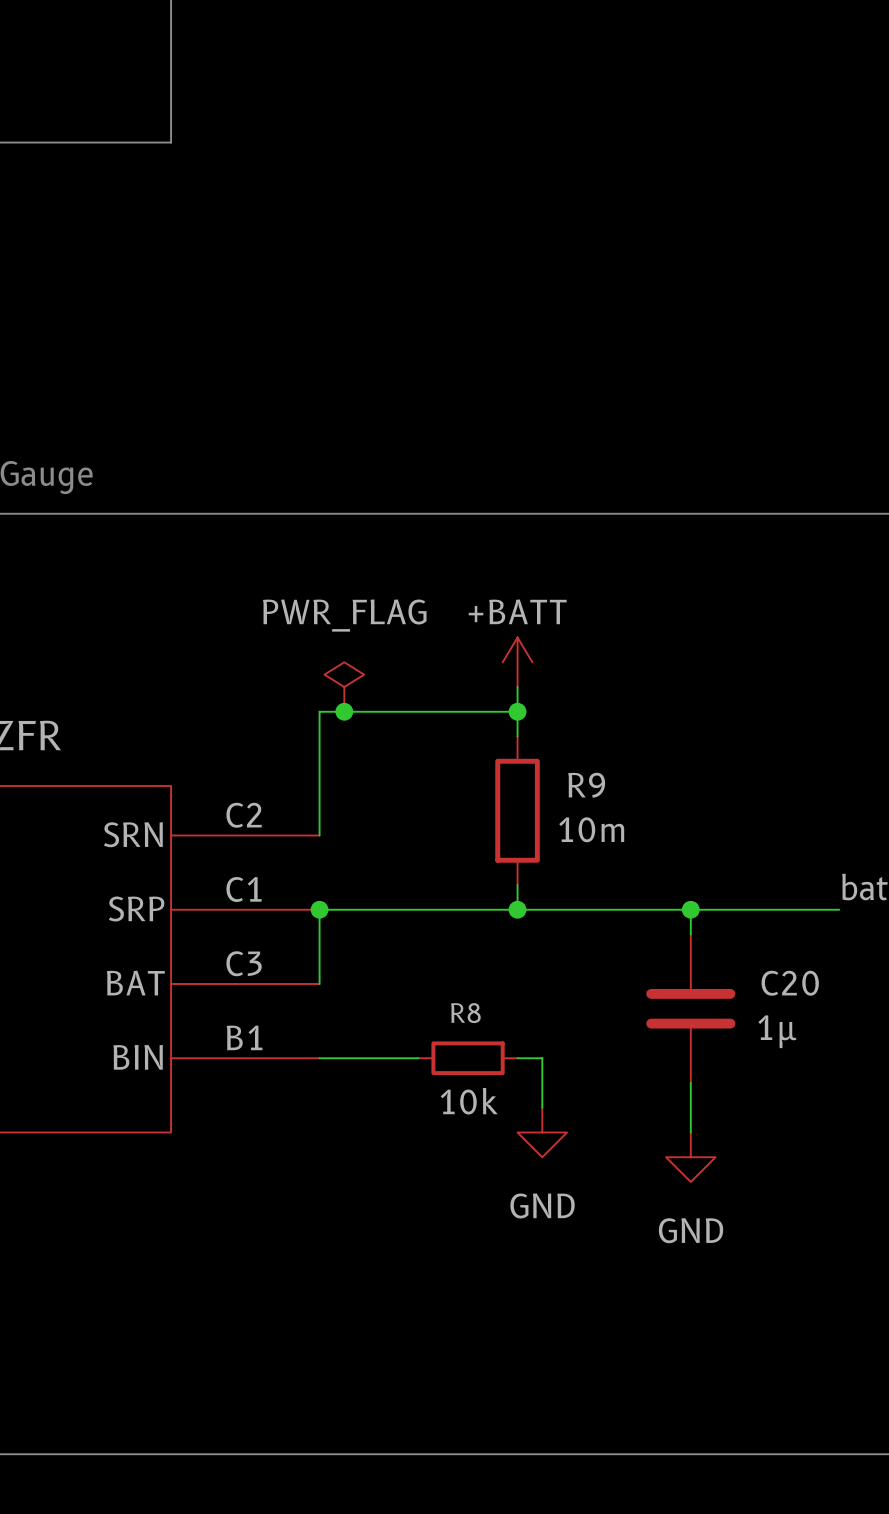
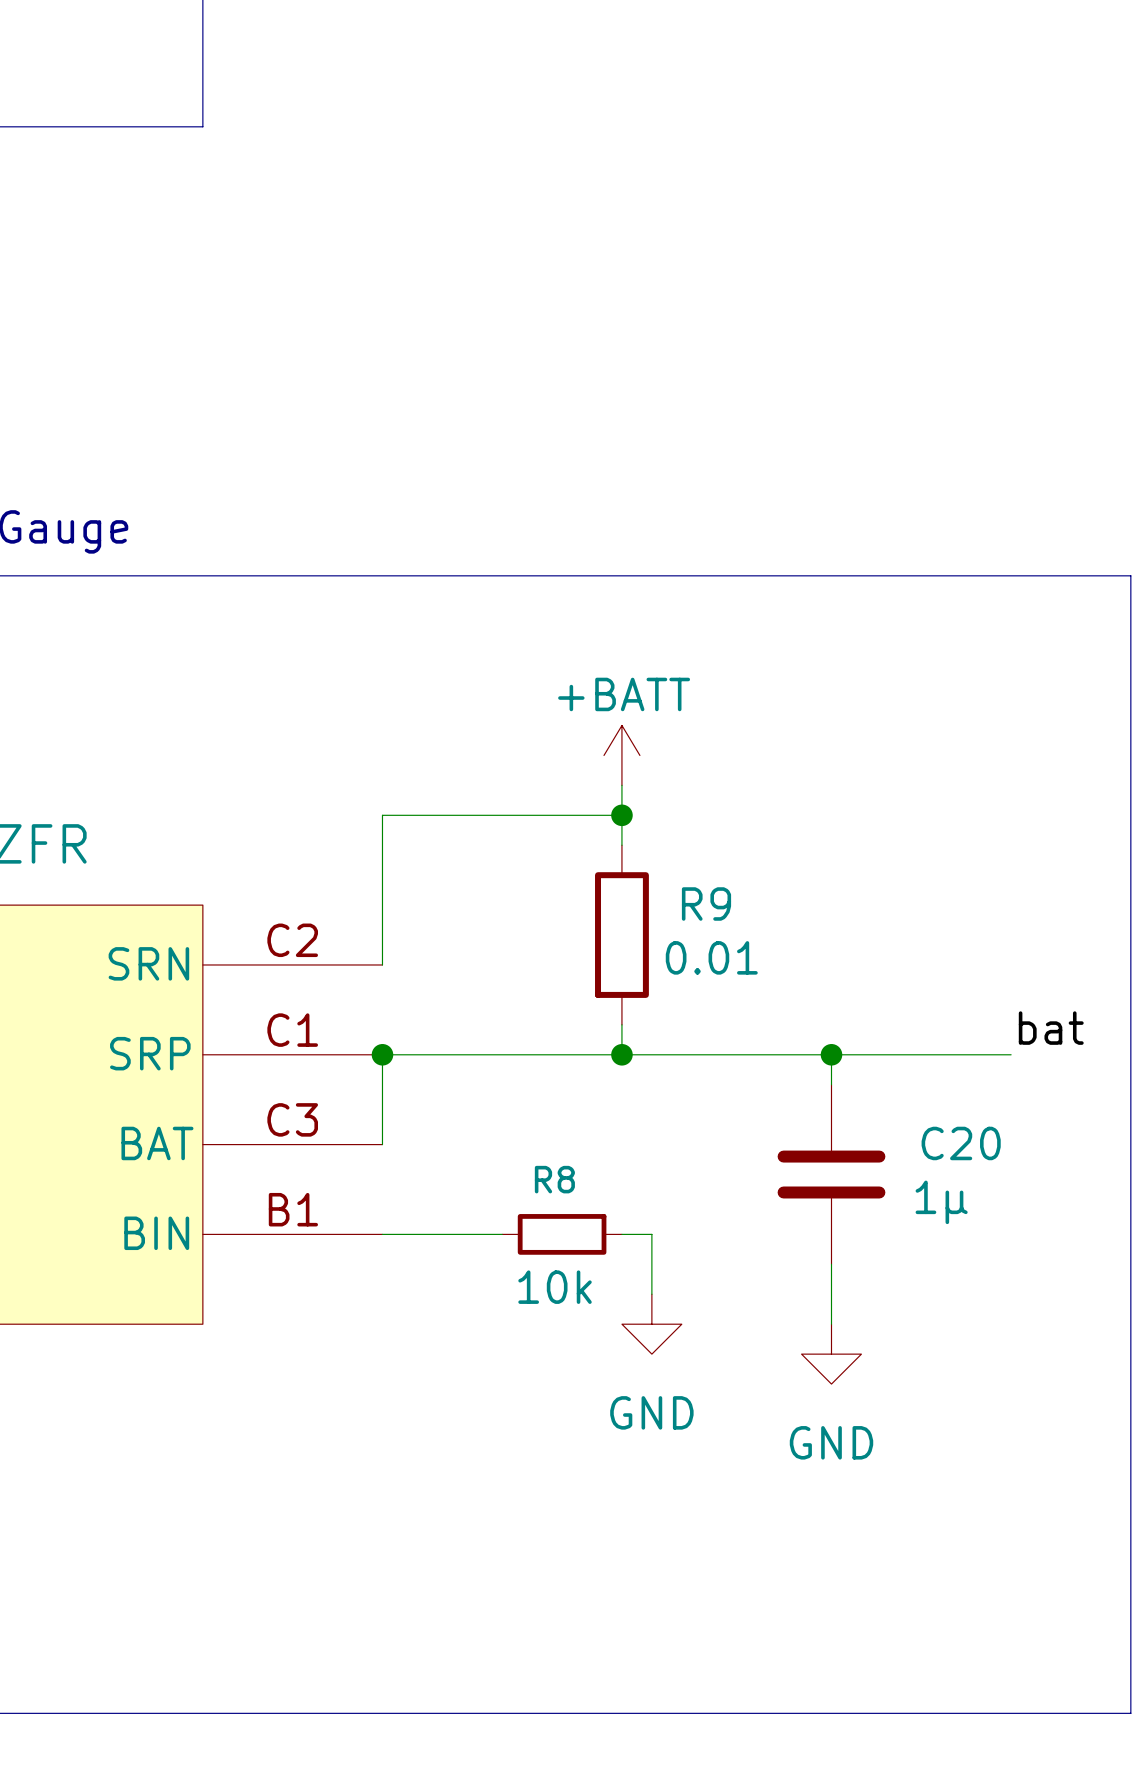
power symbol: PWR_FLAG (344, 687) -> none
junction: (344, 711) -> none
R9 value: 10m (591, 829) -> 0.01 (711, 957)

